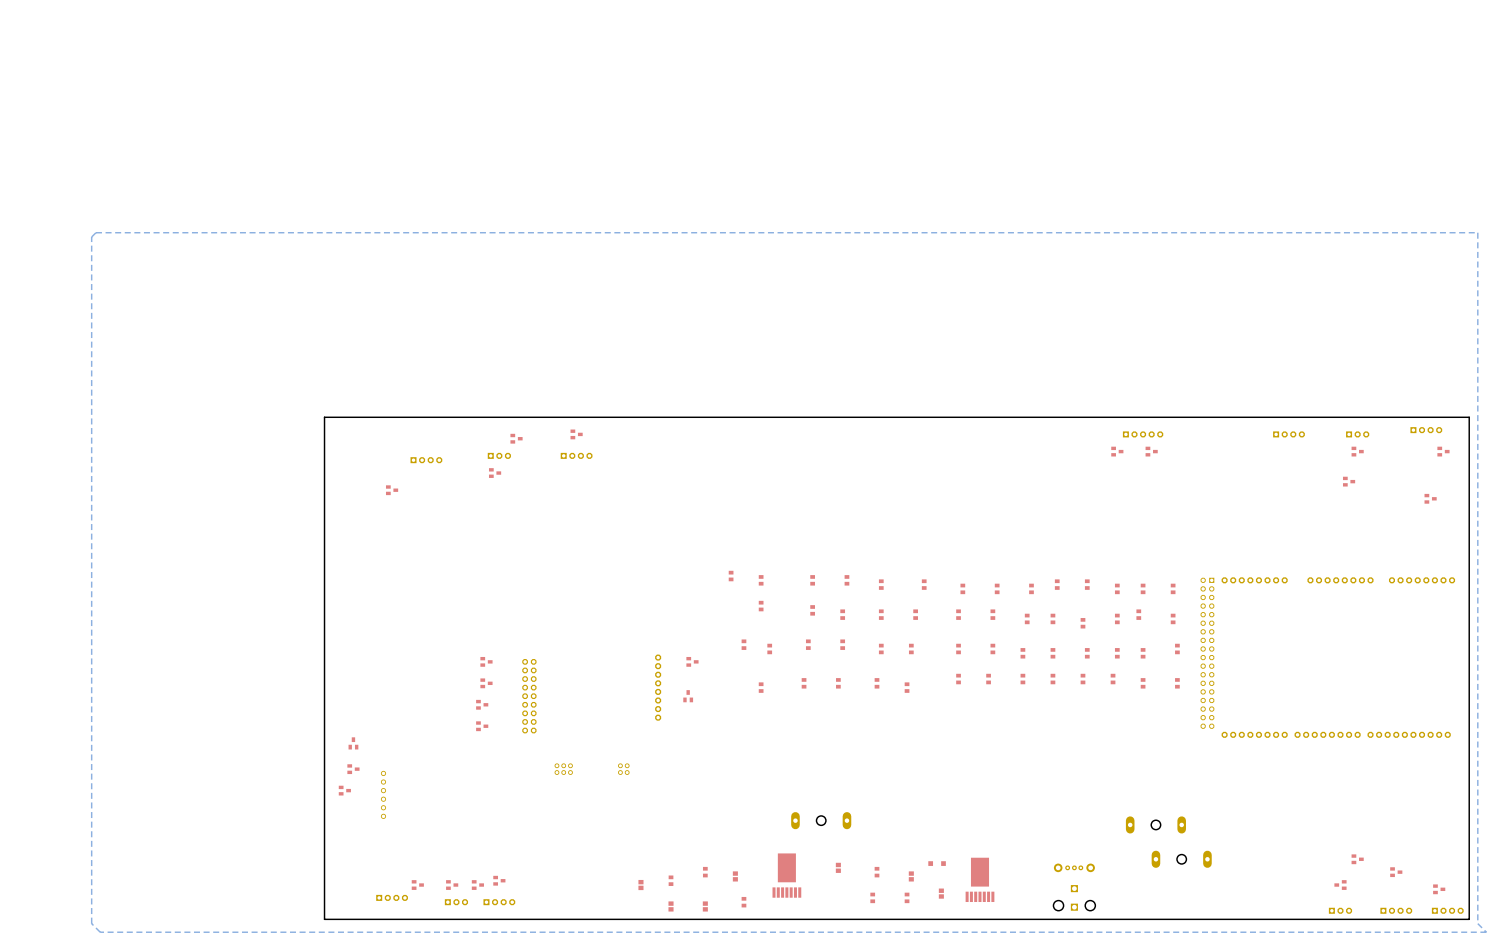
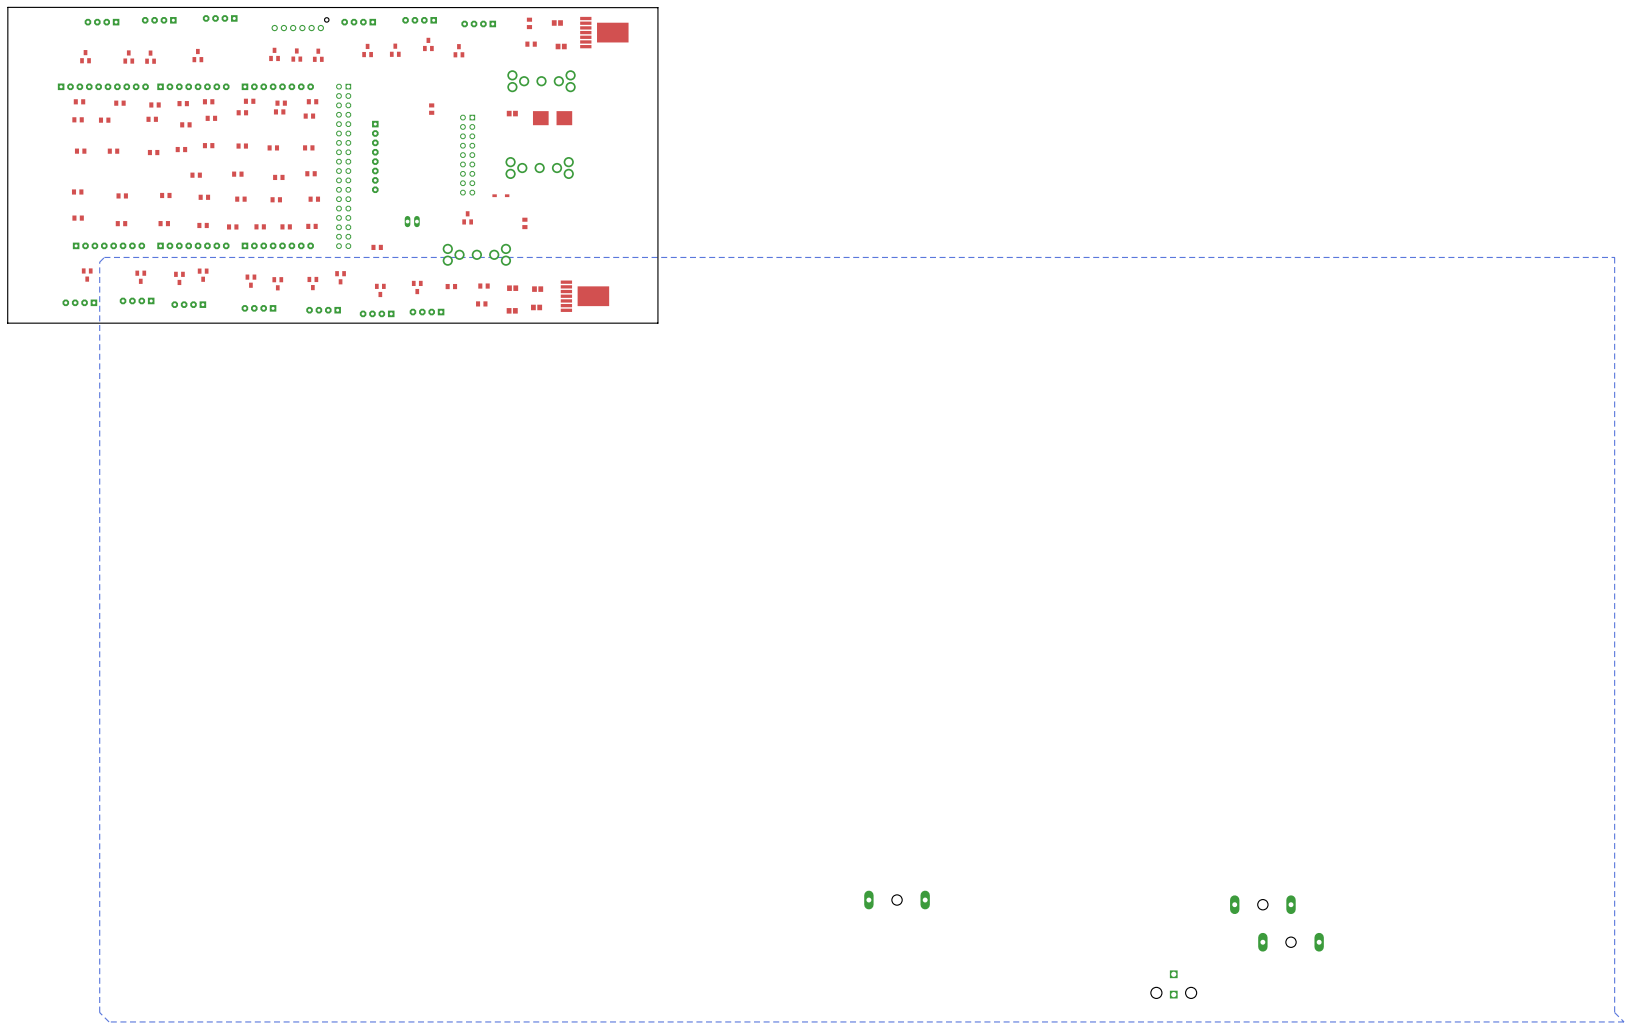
board edge: none -> (7, 7) (657, 7) (657, 323) (7, 323) (7, 7)
part: none -> (220, 18)
part: none -> (159, 20)
part: none -> (419, 20)
part: none -> (102, 22)
part: none -> (358, 22)
part: none -> (529, 23)
part: none -> (557, 22)
part: none -> (300, 24)
part: none -> (478, 23)
part: none -> (604, 32)
part: none -> (428, 44)
part: none -> (531, 44)
part: none -> (561, 46)
part: none -> (367, 50)
part: none -> (395, 50)
part: none -> (458, 50)
part: none -> (274, 54)
part: none -> (197, 55)
part: none -> (296, 55)
part: none -> (318, 55)
part: none -> (85, 56)
part: none -> (128, 57)
part: none -> (150, 57)
part: none -> (541, 81)
part: none -> (103, 86)
part: none -> (193, 86)
part: none -> (277, 86)
part: none -> (249, 101)
part: none -> (79, 101)
part: none -> (208, 101)
part: none -> (312, 101)
part: none -> (119, 103)
part: none -> (183, 103)
part: none -> (281, 103)
part: none -> (155, 104)
part: none -> (431, 109)
part: none -> (279, 111)
part: none -> (242, 112)
part: none -> (512, 113)
part: none -> (309, 116)
part: none -> (211, 118)
part: none -> (552, 118)
part: none -> (78, 119)
part: none -> (152, 119)
part: none -> (104, 120)
part: none -> (185, 124)
part: none -> (208, 145)
part: none -> (242, 146)
part: none -> (273, 147)
part: none -> (308, 147)
part: none -> (181, 149)
part: none -> (80, 151)
part: none -> (113, 151)
part: none -> (153, 152)
part: none -> (467, 155)
part: none -> (375, 156)
part: none -> (343, 166)
part: none -> (539, 168)
part: none -> (237, 174)
part: none -> (311, 173)
part: none -> (196, 175)
part: none -> (278, 177)
part: none -> (77, 191)
part: none -> (122, 195)
part: none -> (165, 195)
part: none -> (500, 195)
part: none -> (204, 197)
part: none -> (240, 199)
part: none -> (276, 199)
part: none -> (314, 199)
part: none -> (78, 218)
part: none -> (467, 217)
part: none -> (412, 221)
part: none -> (121, 223)
part: none -> (164, 223)
part: none -> (524, 223)
part: none -> (203, 225)
part: none -> (232, 226)
part: none -> (260, 226)
part: none -> (286, 226)
part: none -> (311, 226)
part: none -> (108, 245)
part: none -> (193, 245)
part: none -> (277, 245)
part: none -> (377, 247)
part: none -> (476, 254)
part: none -> (87, 275)
part: none -> (203, 275)
part: none -> (140, 277)
part: none -> (179, 278)
part: none -> (340, 277)
part: none -> (250, 281)
part: none -> (277, 283)
part: none -> (312, 283)
part: none -> (484, 286)
part: none -> (451, 286)
part: none -> (417, 287)
part: none -> (512, 288)
part: none -> (537, 289)
part: none -> (380, 290)
part: none -> (584, 296)
part: none -> (137, 300)
part: none -> (79, 302)
part: none -> (188, 304)
part: none -> (481, 303)
part: none -> (536, 307)
part: none -> (258, 308)
part: none -> (323, 310)
part: none -> (512, 310)
part: none -> (427, 312)
part: none -> (377, 313)
board edge: (1469, 417) (324, 417) (324, 919) (1469, 919) (1469, 417) -> none
part: (1426, 430) -> none
part: (576, 434) -> none
part: (1143, 434) -> none
part: (1288, 434) -> none
part: (1357, 434) -> none
part: (516, 438) -> none
part: (1117, 451) -> none
part: (1151, 451) -> none
part: (1357, 451) -> none
part: (1443, 451) -> none
part: (499, 455) -> none
part: (576, 455) -> none
part: (426, 460) -> none
part: (495, 473) -> none
part: (1349, 481) -> none
part: (392, 490) -> none
part: (1430, 498) -> none
part: (731, 576) -> none
part: (761, 580) -> none
part: (812, 580) -> none
part: (846, 580) -> none
part: (1254, 580) -> none
part: (1340, 580) -> none
part: (1422, 580) -> none
part: (881, 584) -> none
part: (924, 584) -> none
part: (1057, 584) -> none
part: (1087, 584) -> none
part: (962, 588) -> none
part: (997, 588) -> none
part: (1031, 588) -> none
part: (1117, 588) -> none
part: (1143, 588) -> none
part: (1173, 588) -> none
part: (761, 606) -> none
part: (812, 610) -> none
part: (842, 614) -> none
part: (881, 614) -> none
part: (915, 614) -> none
part: (958, 614) -> none
part: (992, 614) -> none
part: (1138, 614) -> none
part: (1027, 618) -> none
part: (1052, 618) -> none
part: (1117, 618) -> none
part: (1173, 618) -> none
part: (1082, 623) -> none
part: (743, 644) -> none
part: (808, 644) -> none
part: (842, 644) -> none
part: (769, 648) -> none
part: (881, 648) -> none
part: (911, 648) -> none
part: (958, 648) -> none
part: (992, 648) -> none
part: (1177, 648) -> none
part: (1022, 653) -> none
part: (1052, 653) -> none
part: (1087, 653) -> none
part: (1117, 653) -> none
part: (1143, 653) -> none
part: (1207, 653) -> none
part: (486, 661) -> none
part: (692, 661) -> none
part: (958, 679) -> none
part: (988, 679) -> none
part: (1022, 679) -> none
part: (1052, 679) -> none
part: (1082, 679) -> none
part: (1113, 679) -> none
part: (486, 683) -> none
part: (804, 683) -> none
part: (838, 683) -> none
part: (877, 683) -> none
part: (1143, 683) -> none
part: (1177, 683) -> none
part: (658, 687) -> none
part: (761, 687) -> none
part: (907, 687) -> none
part: (529, 696) -> none
part: (688, 696) -> none
part: (482, 704) -> none
part: (482, 726) -> none
part: (1254, 734) -> none
part: (1327, 734) -> none
part: (1409, 734) -> none
part: (353, 743) -> none
part: (353, 769) -> none
part: (563, 769) -> none
part: (623, 769) -> none
part: (344, 790) -> none
part: (383, 794) -> none
part: (1357, 859) -> none
part: (937, 863) -> none
part: (838, 867) -> none
part: (1074, 867) -> none
part: (705, 872) -> none
part: (877, 872) -> none
part: (1396, 872) -> none
part: (786, 875) -> none
part: (735, 876) -> none
part: (911, 876) -> none
part: (979, 879) -> none
part: (499, 880) -> none
part: (671, 880) -> none
part: (417, 885) -> none
part: (452, 885) -> none
part: (477, 885) -> none
part: (640, 885) -> none
part: (1340, 885) -> none
part: (1439, 889) -> none
part: (941, 893) -> none
part: (392, 897) -> none
part: (872, 897) -> none
part: (907, 897) -> none
part: (456, 902) -> none
part: (499, 902) -> none
part: (743, 902) -> none
part: (671, 906) -> none
part: (705, 906) -> none
part: (1340, 910) -> none
part: (1396, 910) -> none
part: (1447, 910) -> none

